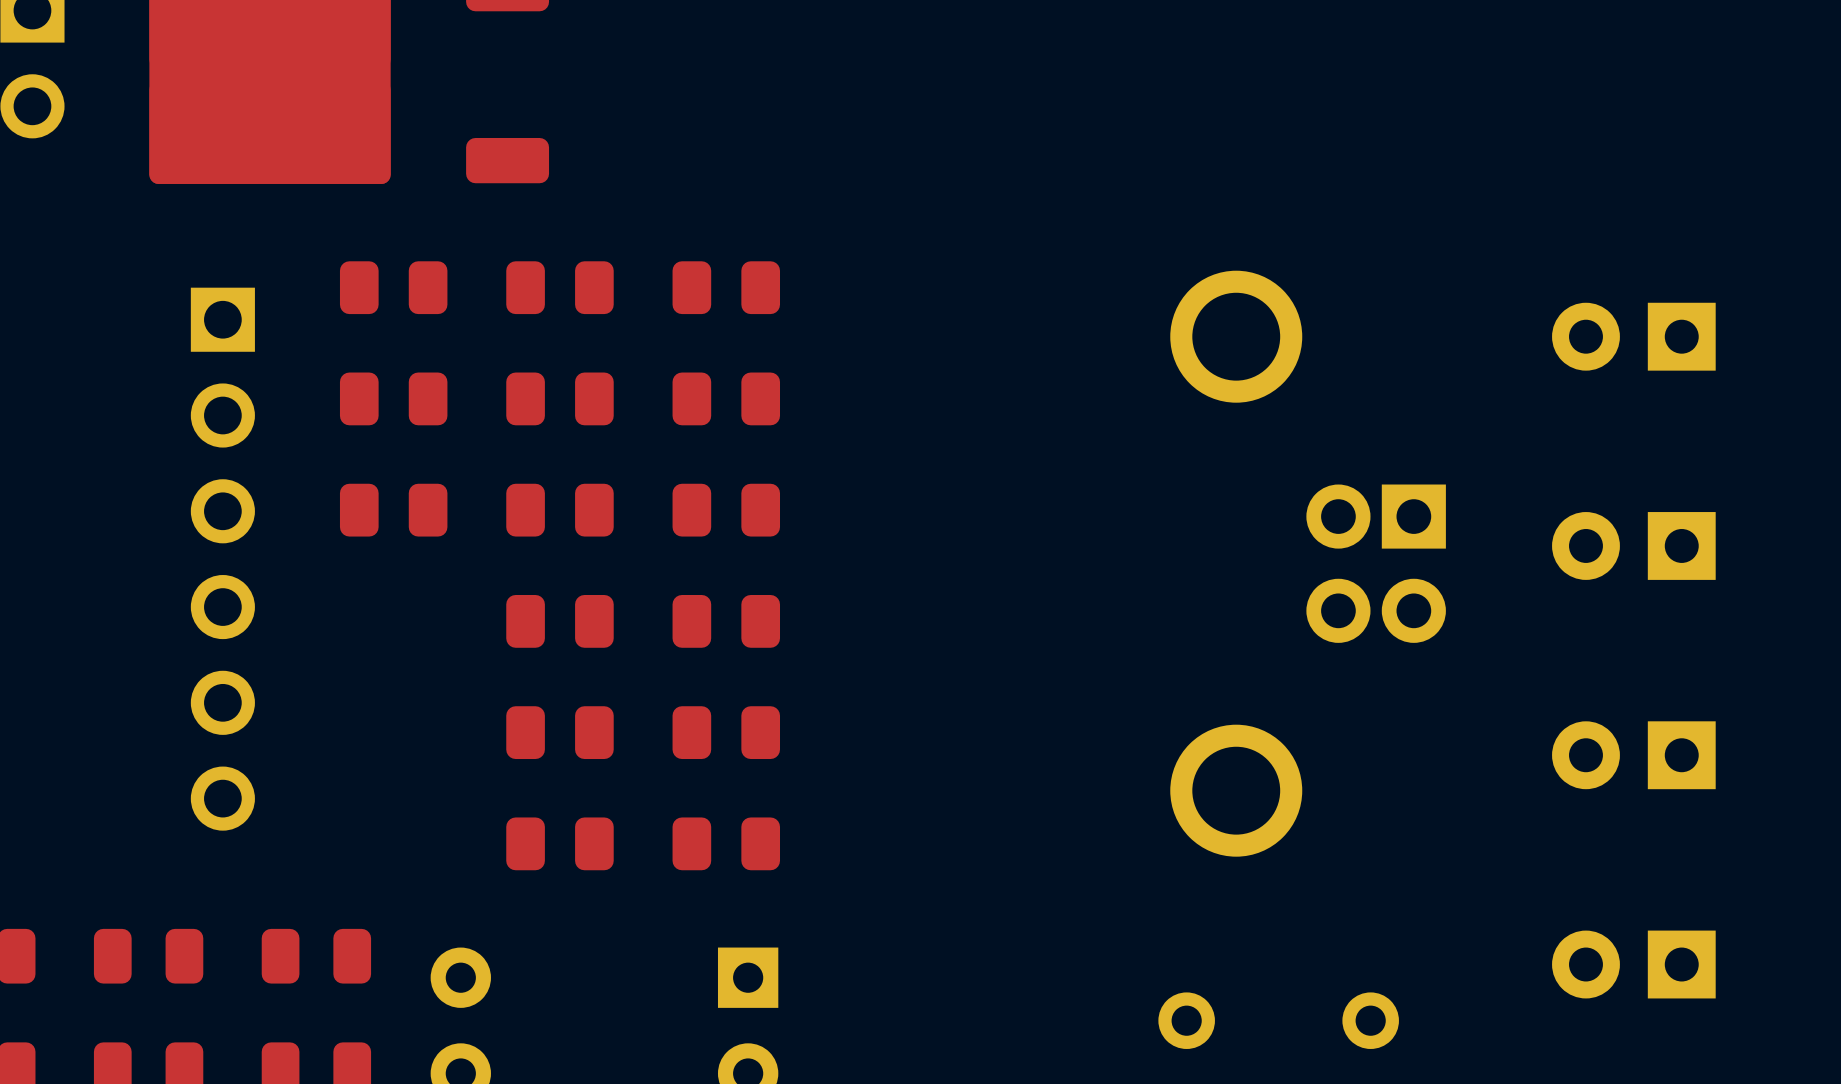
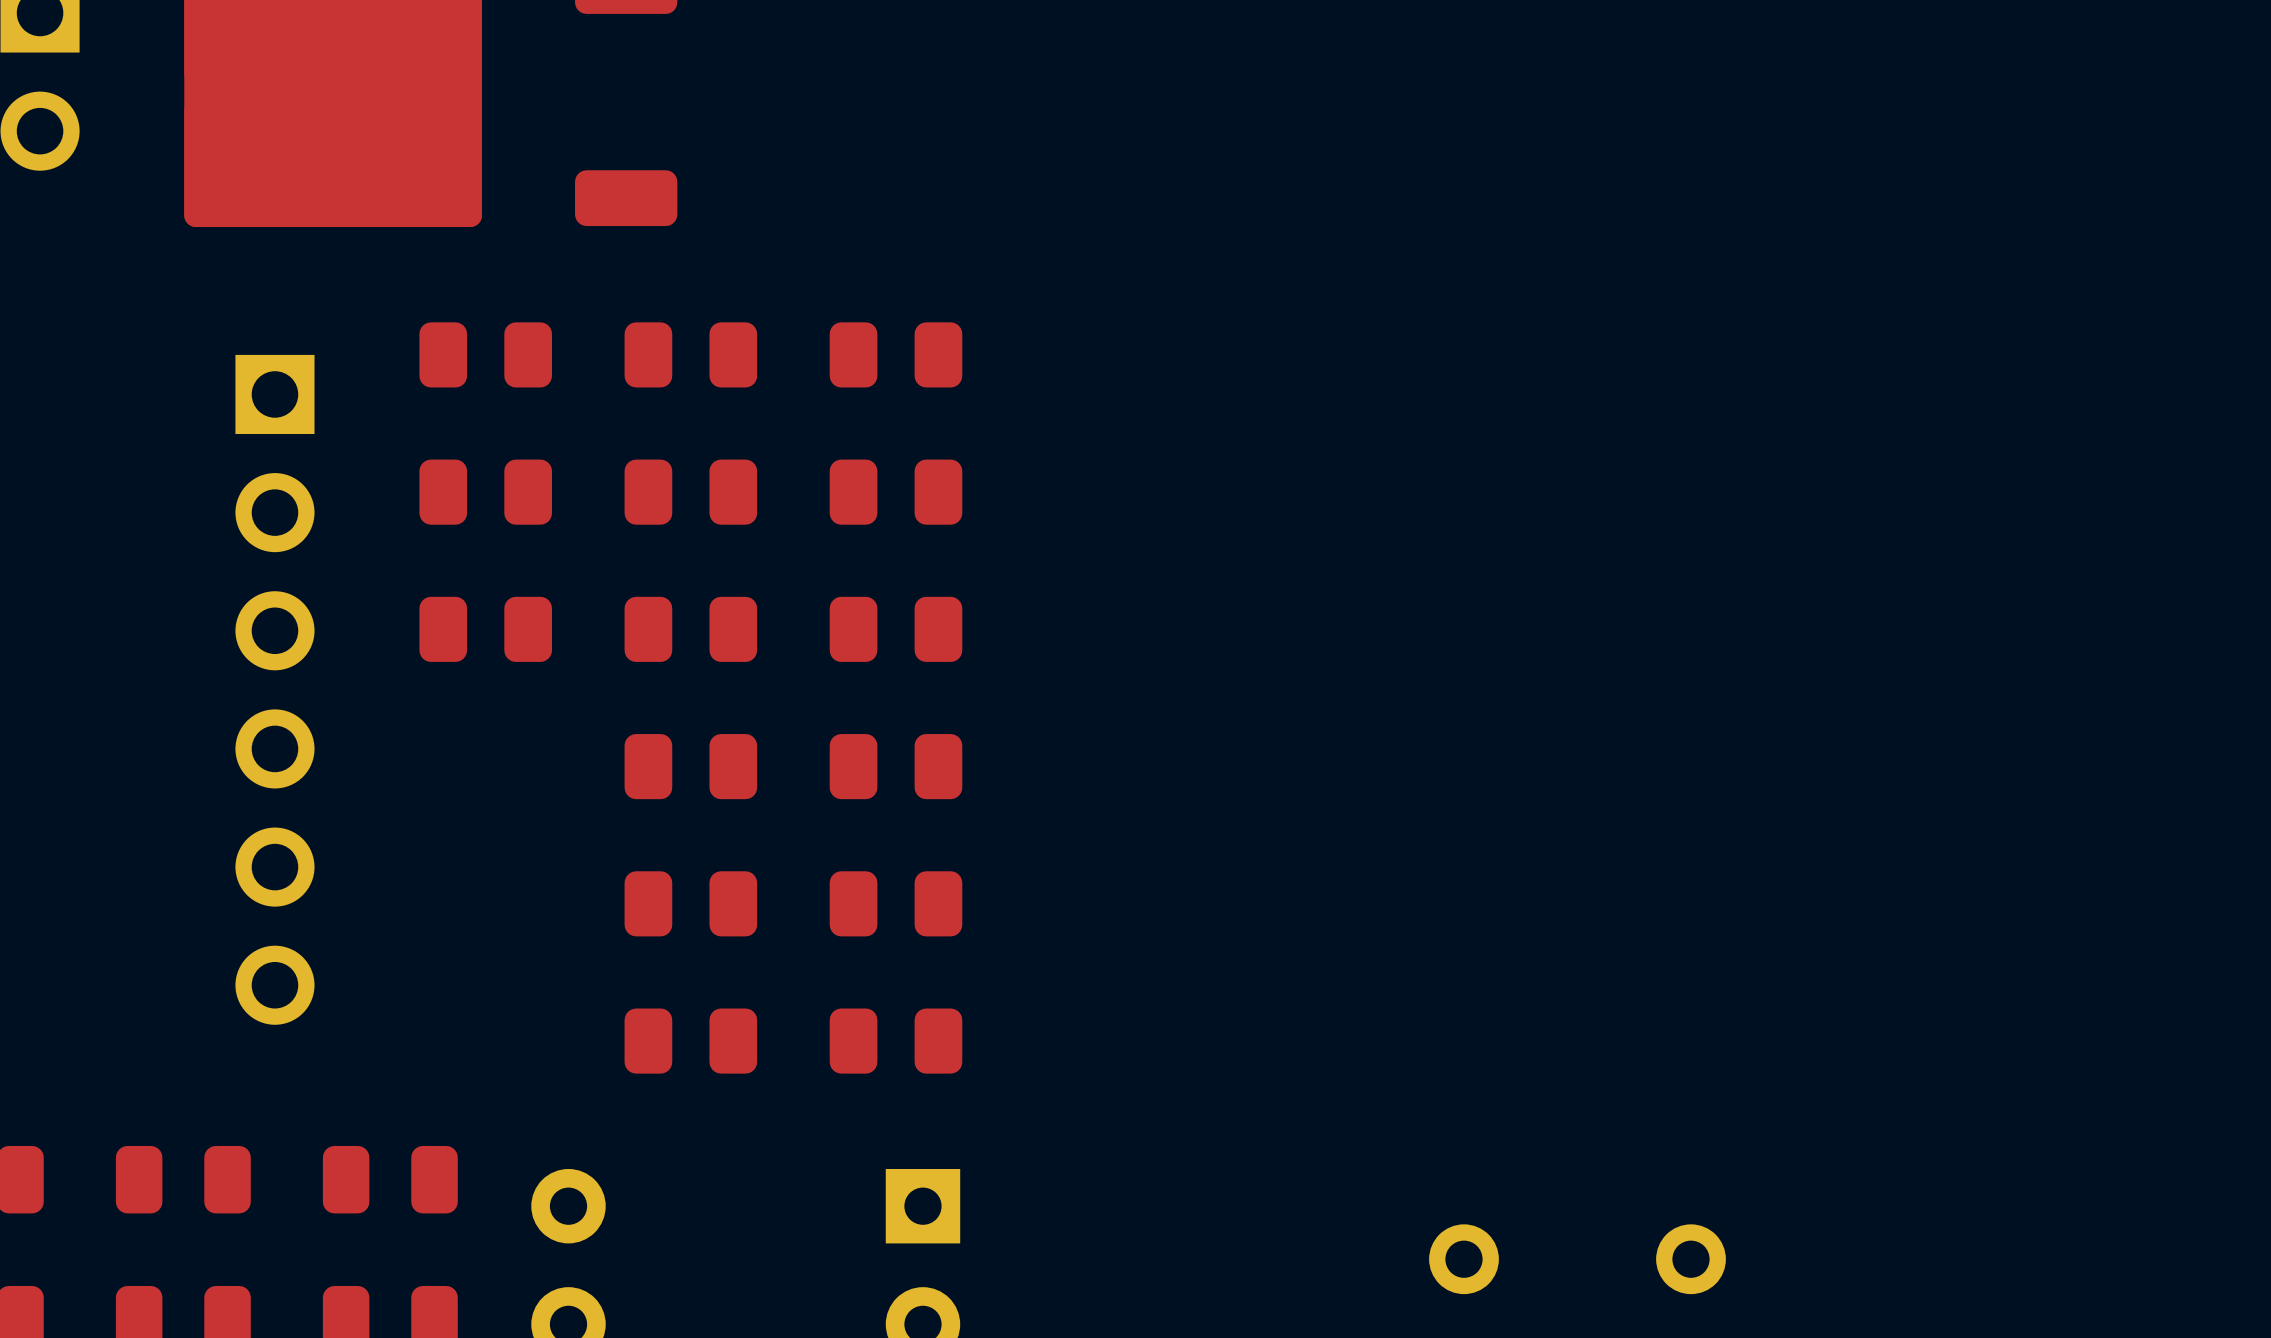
part: (1633, 336) -> none
part: (1633, 545) -> none
part: (1308, 563) -> none
part: (1633, 755) -> none
part: (1633, 964) -> none

